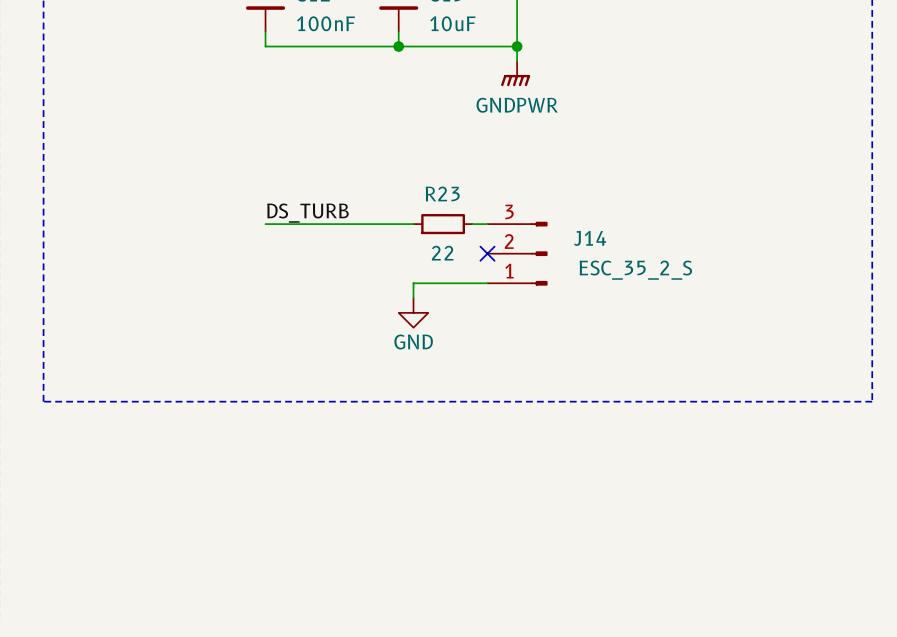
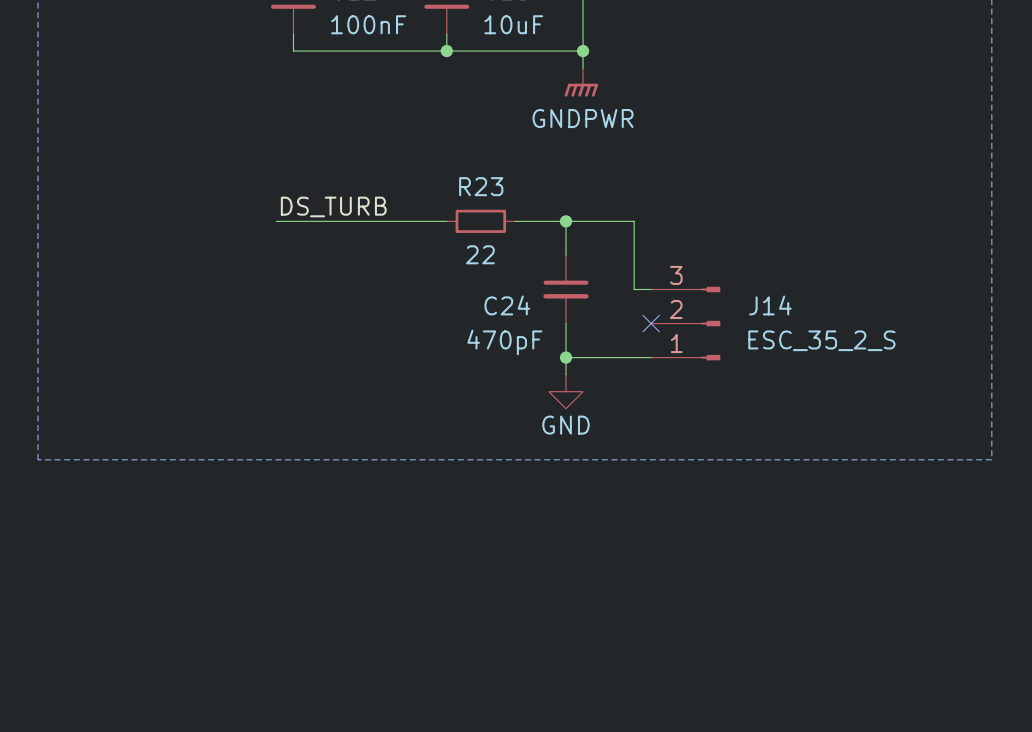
wire: none -> (514, 221) (634, 221) (634, 289) (651, 289)
wire: none -> (566, 221) (566, 255)
junction: none -> (566, 221)
label position: DS_TURB (307, 213) -> DS_TURB (333, 206)
wire: (265, 224) (413, 224) -> (276, 221) (446, 221)
R23 position: (443, 224) -> (480, 221)
wire: (472, 224) (487, 224) -> none
no-connect mark: (487, 253) -> none
C24: none -> 470pF (566, 289)
J14 position: (517, 253) -> (685, 323)
wire: (487, 283) (413, 283) (413, 298) -> none
wire: none -> (566, 323) (566, 374)
no-connect mark: none -> (651, 323)
power symbol position: GND (413, 312) -> GND (566, 391)
wire: none -> (566, 357) (651, 357)
junction: none -> (566, 357)

